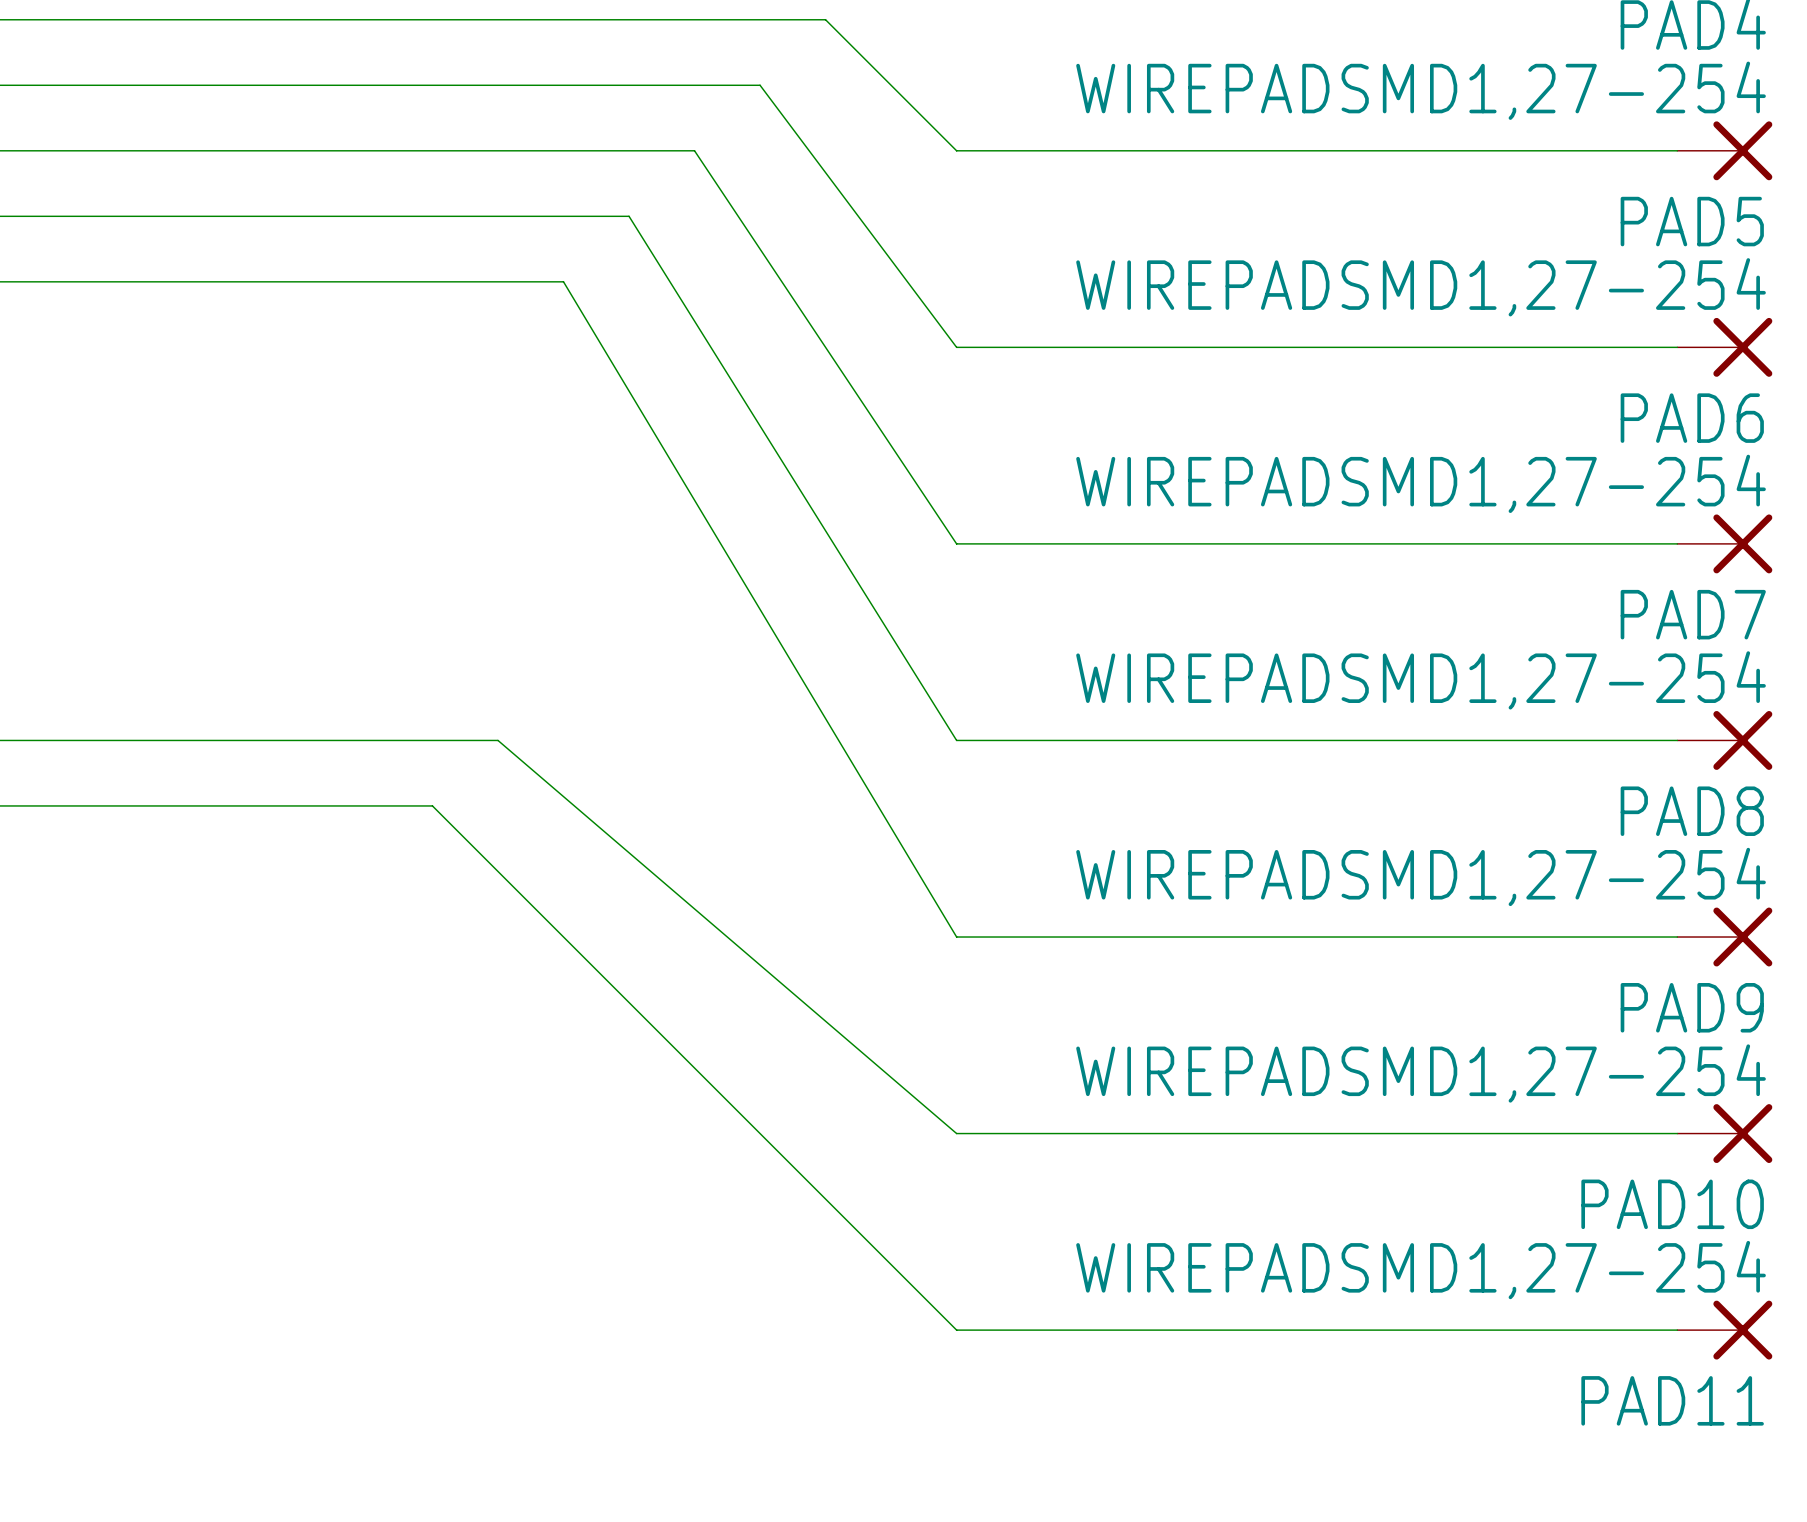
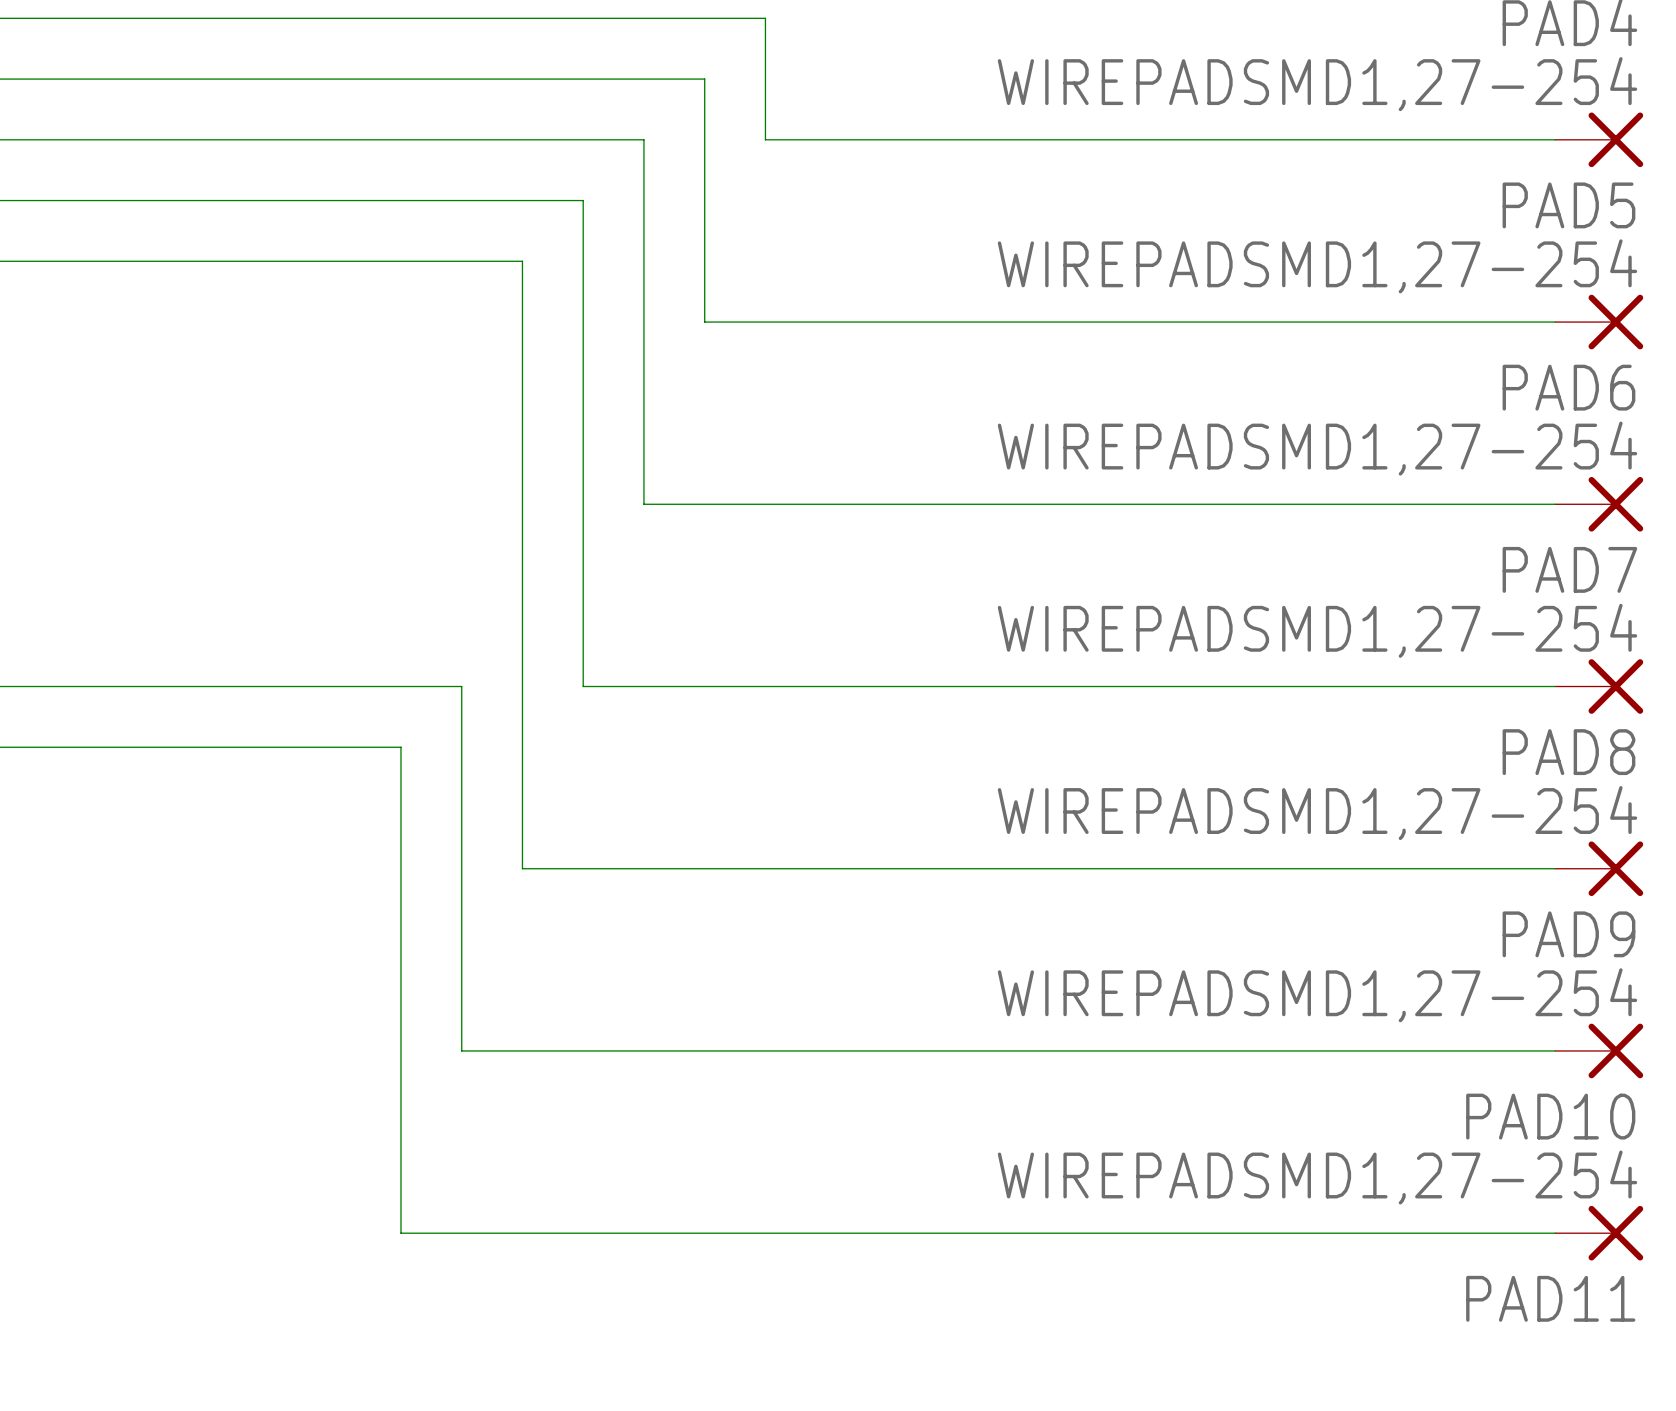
wire: (825, 19) (956, 150) -> (765, 18) (765, 139) (886, 139)
wire: (760, 85) (956, 347) -> (704, 79) (704, 322) (886, 322)
wire: (694, 150) (956, 543) -> (643, 139) (643, 504) (886, 504)
wire: (629, 216) (956, 740) -> (583, 200) (583, 686) (886, 686)
wire: (563, 281) (956, 937) -> (522, 261) (522, 868) (886, 868)
wire: (498, 740) (956, 1133) -> (461, 686) (461, 1050) (886, 1050)
wire: (432, 805) (956, 1330) -> (400, 747) (400, 1233) (886, 1233)

